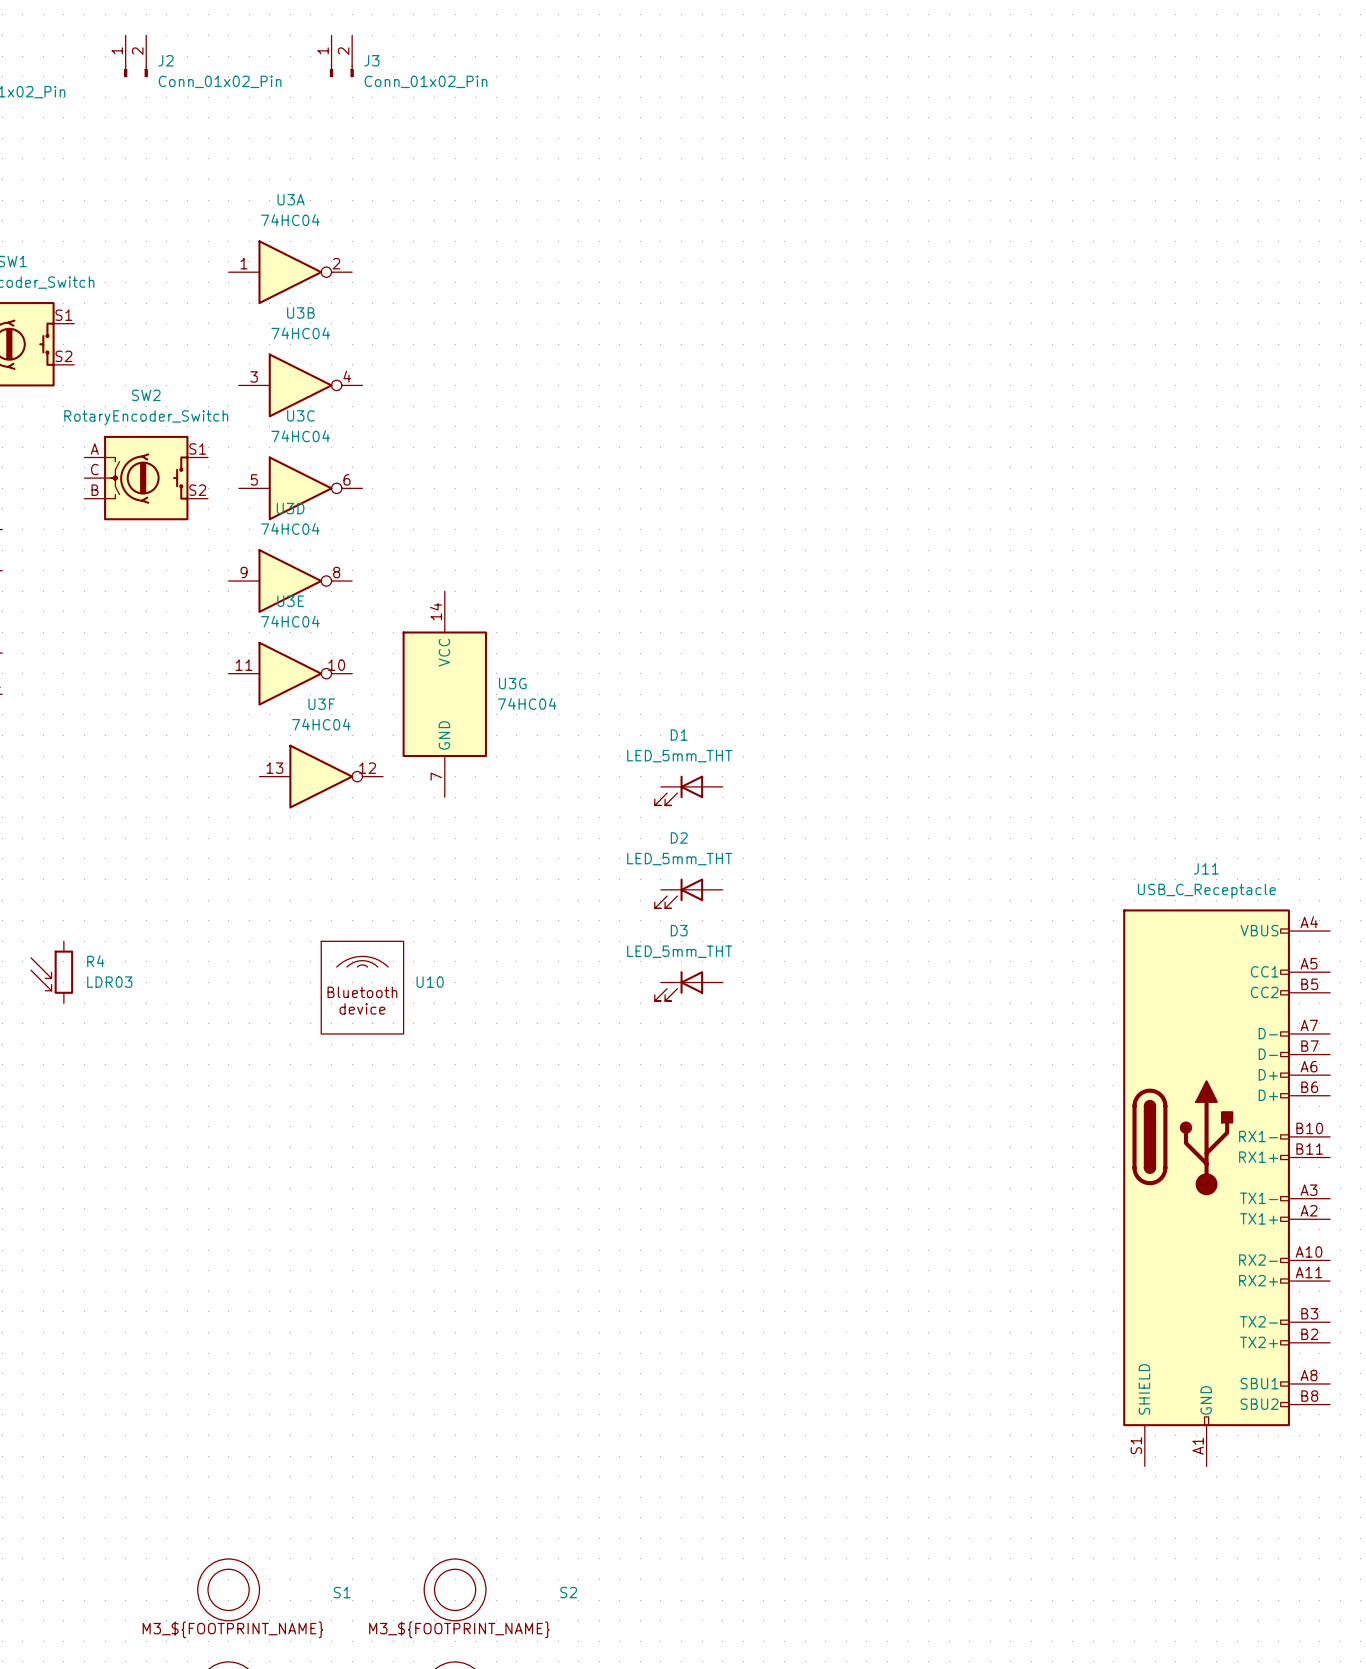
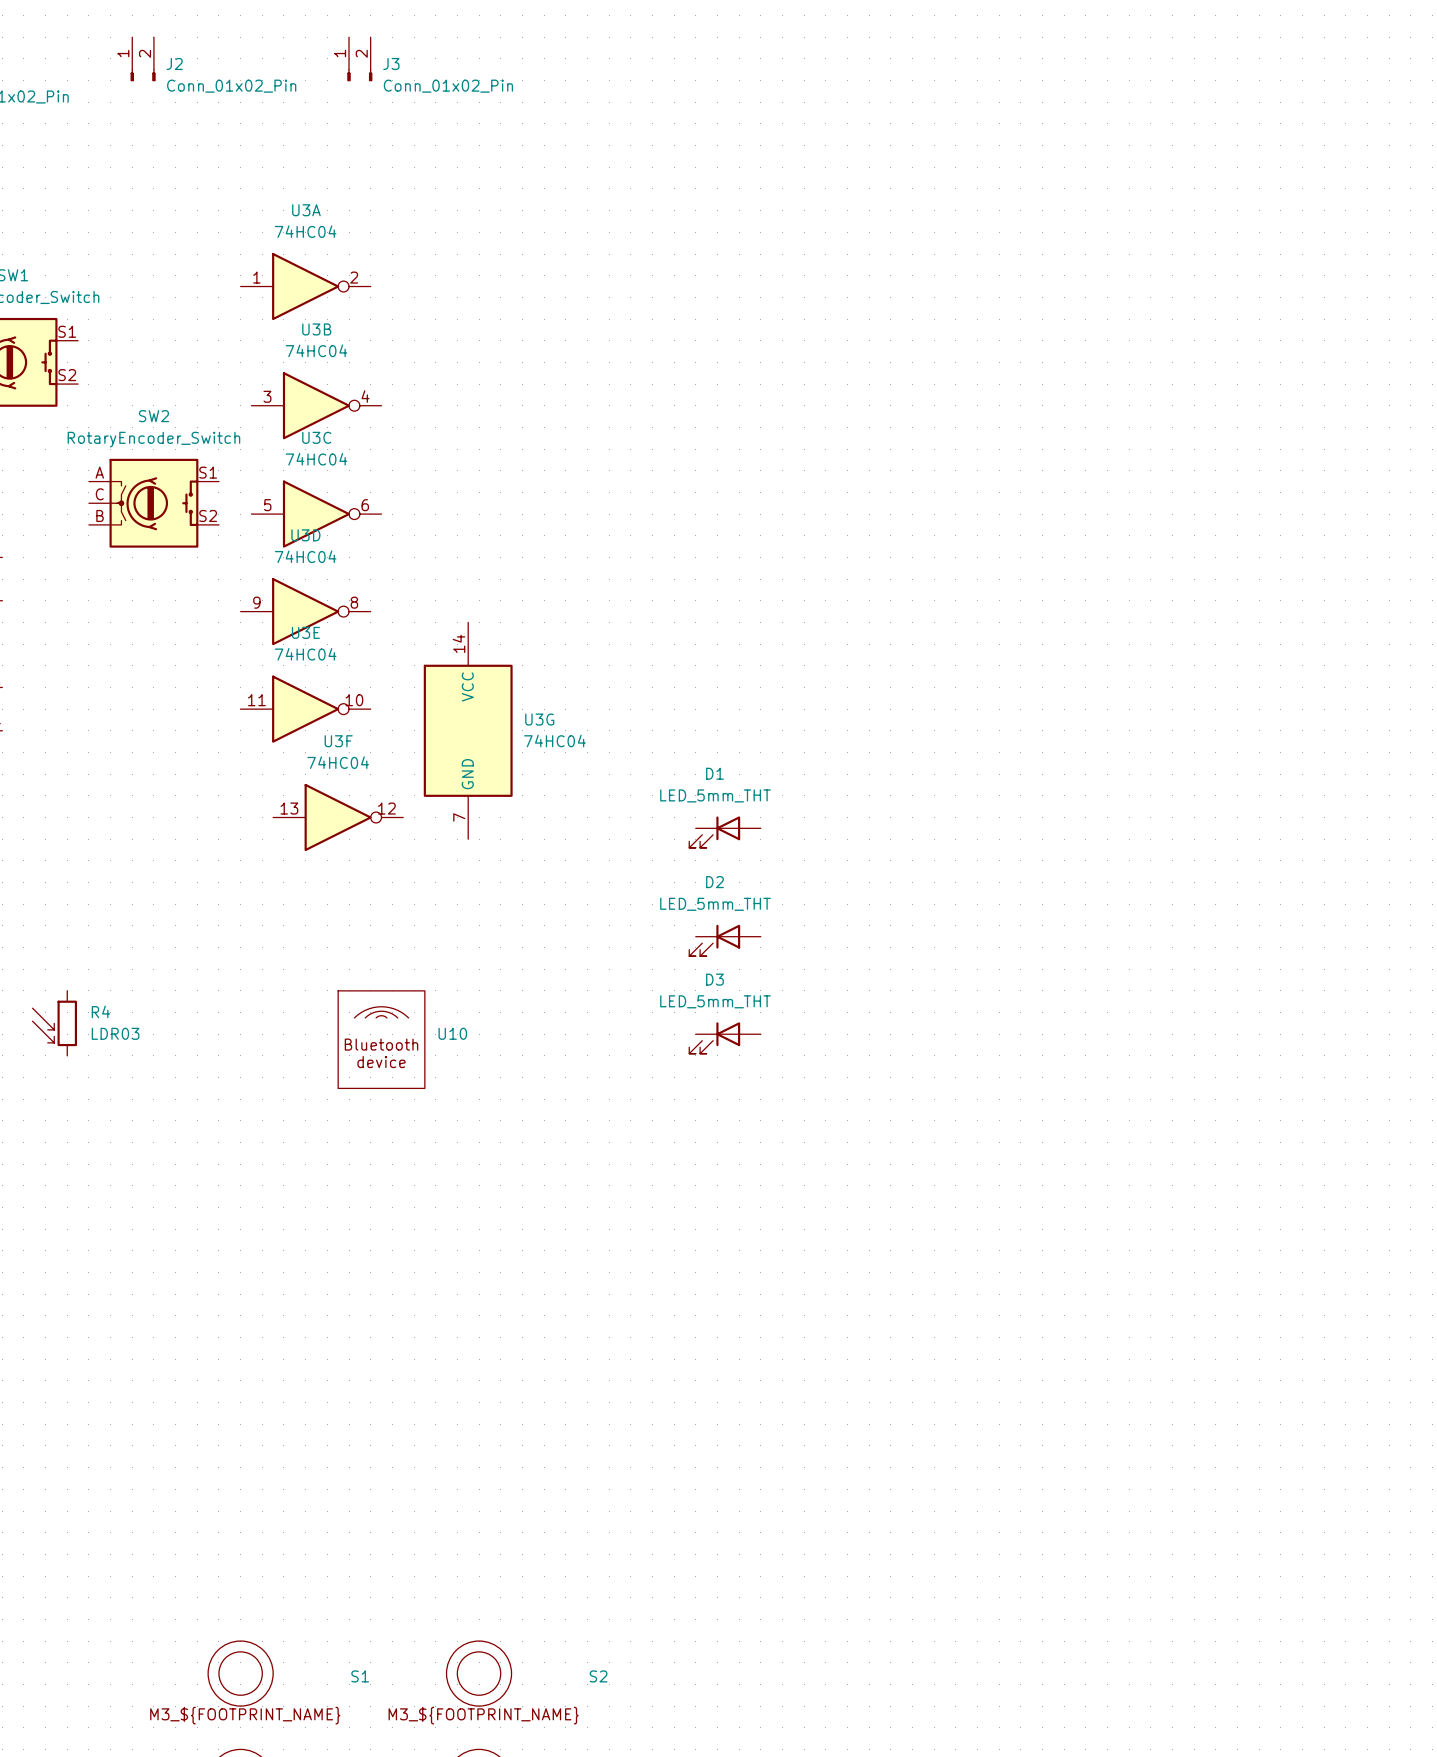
J11: USB_C_Receptacle (1226, 1187) -> none

